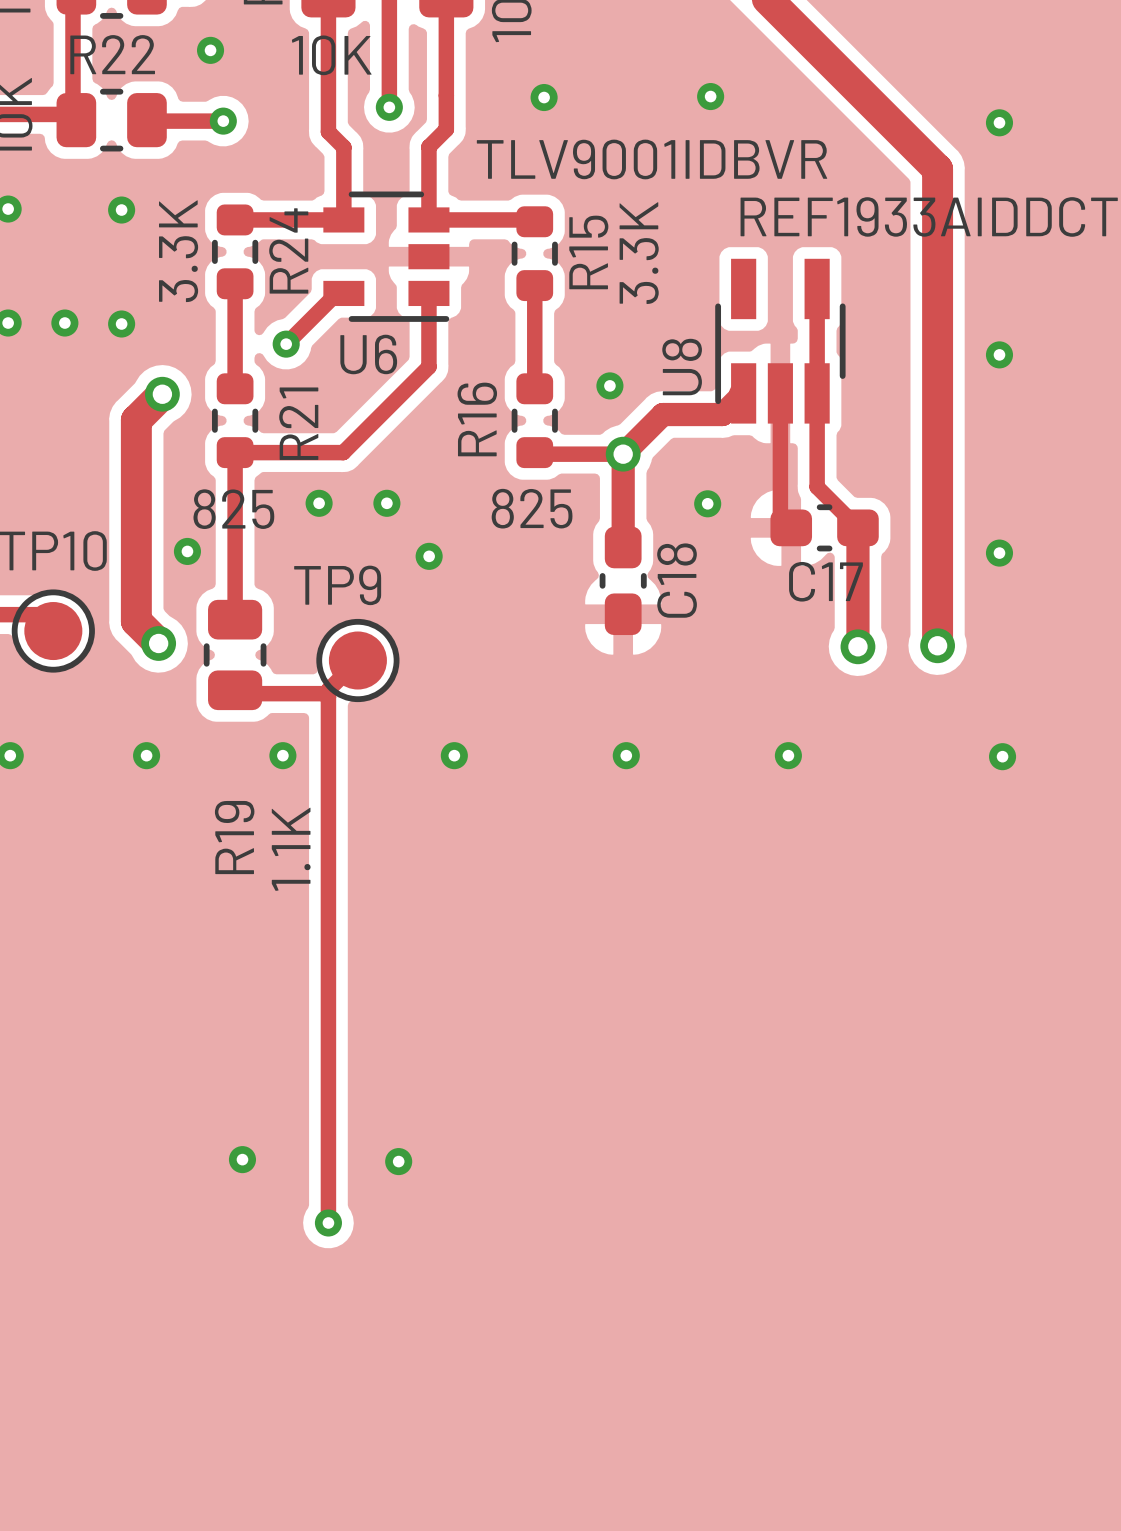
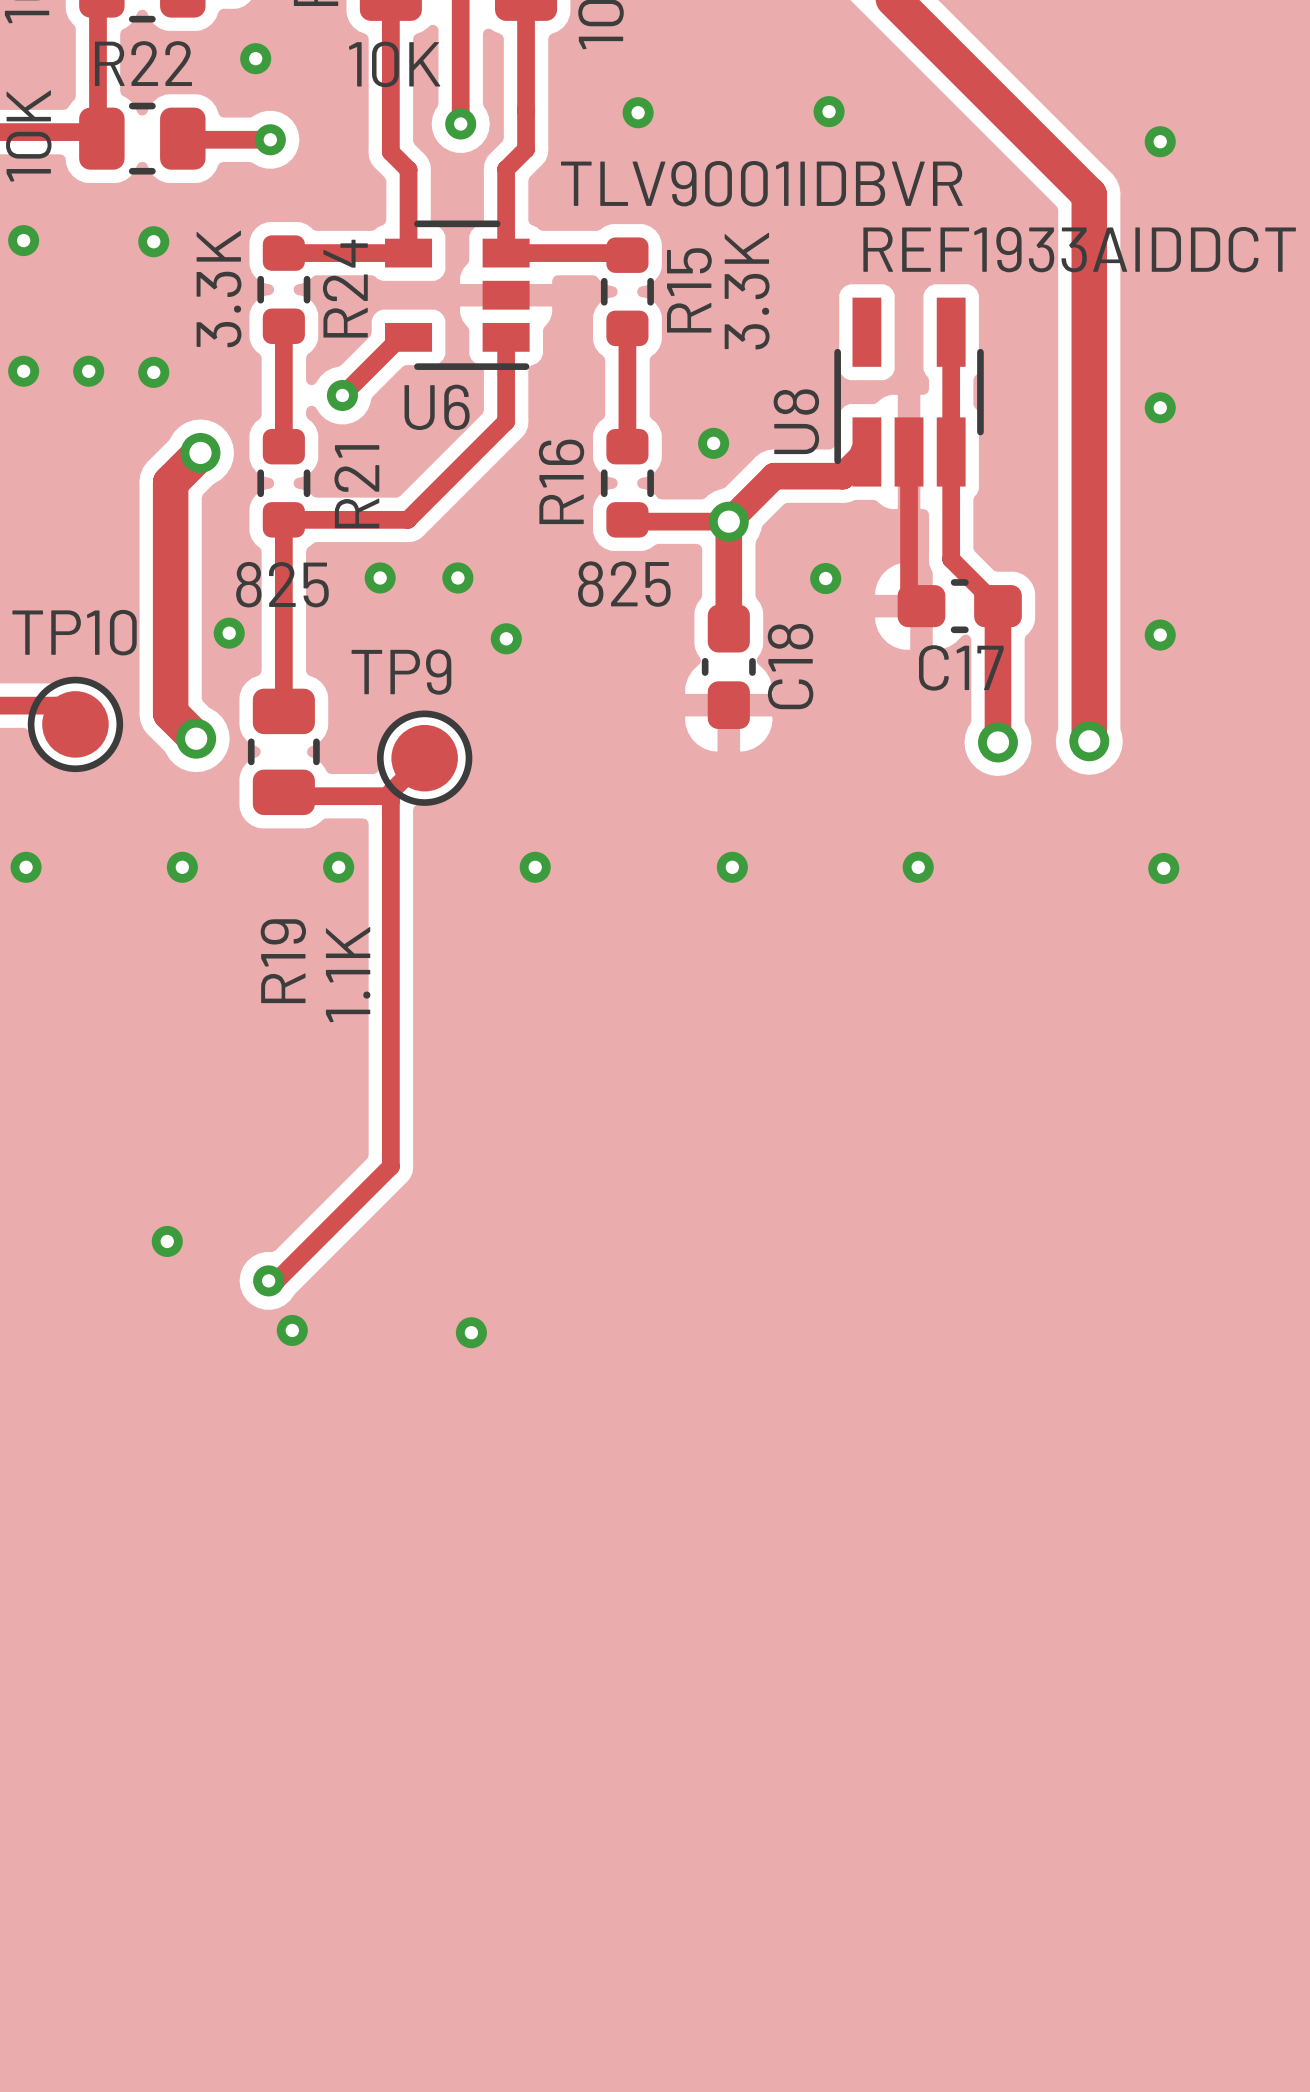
track: (328, 1016) (328, 1222) -> (390, 1166) (276, 1280) (268, 1280)
via: none -> (167, 1241)
via: none -> (268, 1280)
via: (328, 1222) -> none

